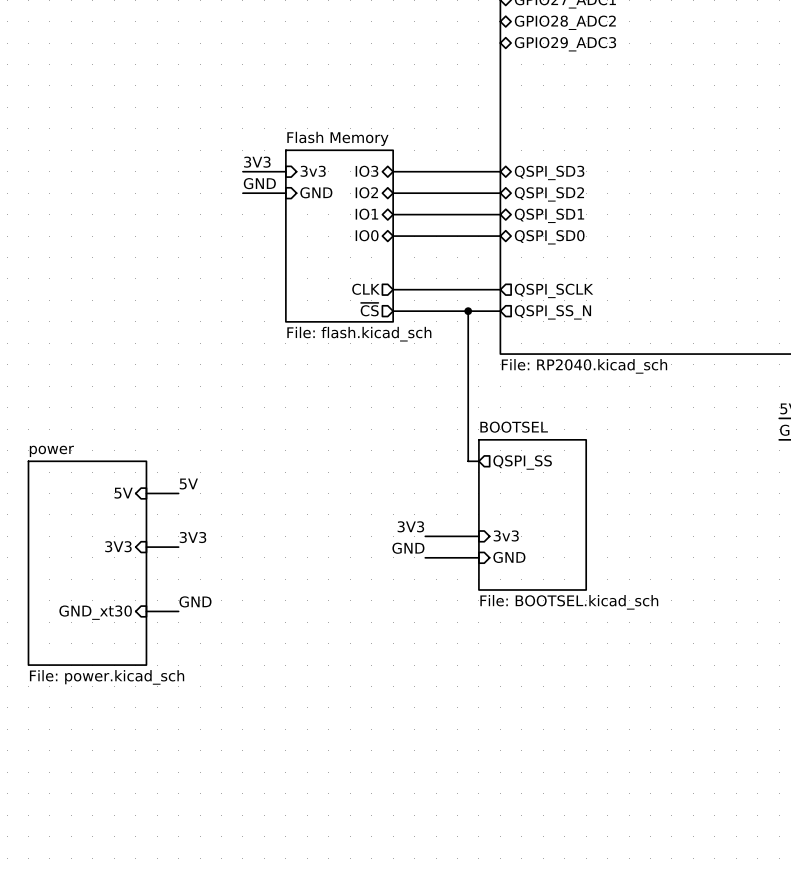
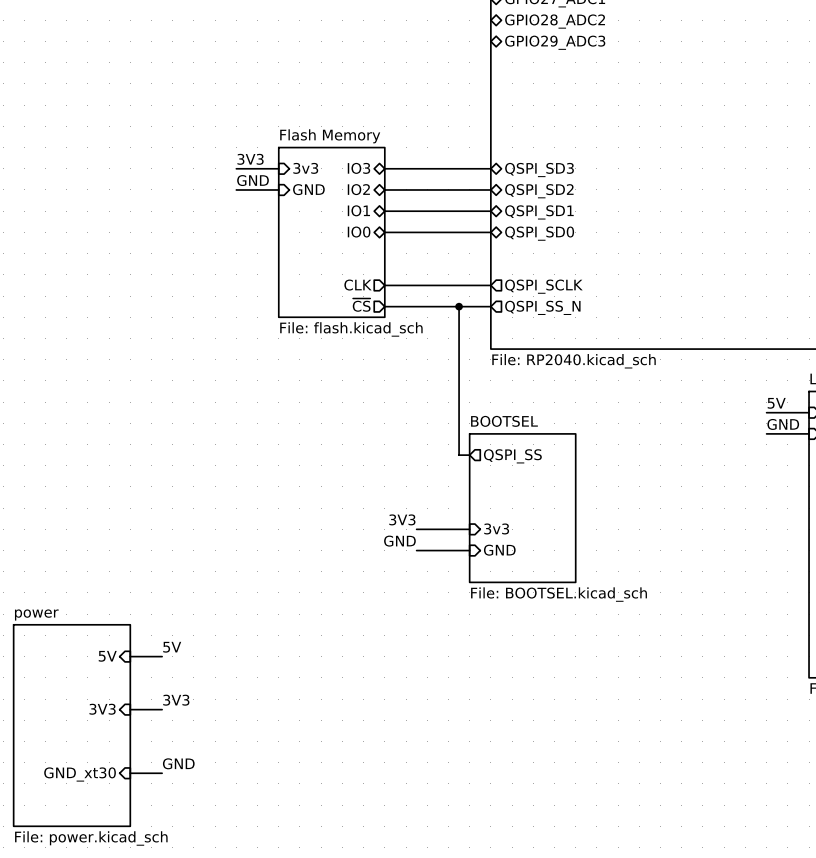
label position: 5V (188, 484) -> 5V (172, 647)
sheet pin position: 5V (123, 493) -> 5V (107, 656)
wire: (146, 493) (178, 493) -> (130, 656) (162, 656)
label position: 3V3 (192, 537) -> 3V3 (176, 700)
sheet pin position: 3V3 (118, 546) -> 3V3 (102, 709)
wire: (146, 547) (178, 547) -> (130, 709) (162, 709)
sheet power position: (87, 563) -> (71, 725)
label position: GND (195, 601) -> GND (178, 763)
wire: (146, 611) (178, 611) -> (130, 773) (162, 773)
sheet pin position: GND_xt30 (95, 612) -> GND_xt30 (80, 774)

